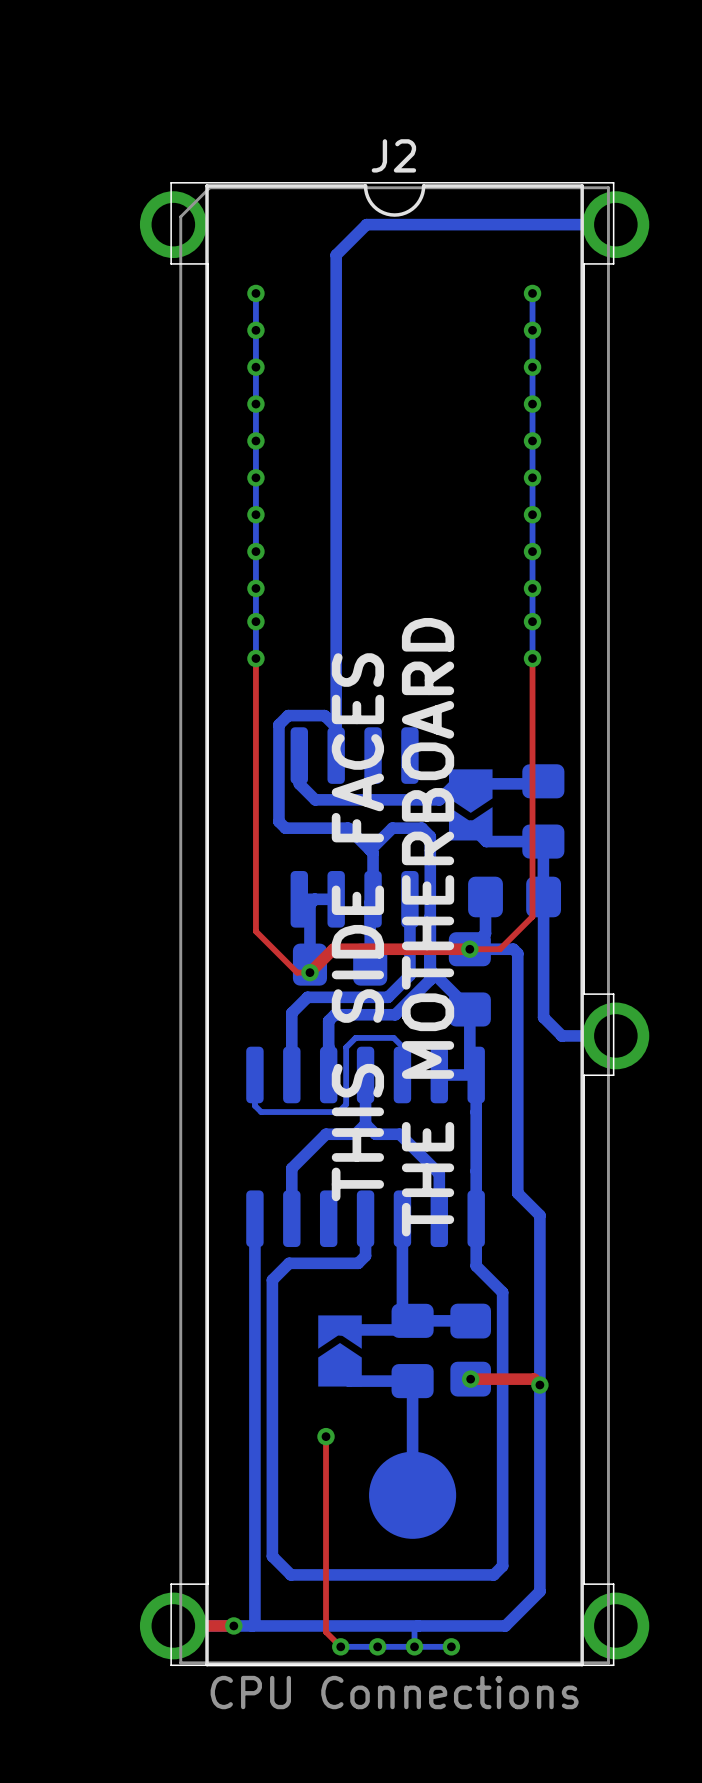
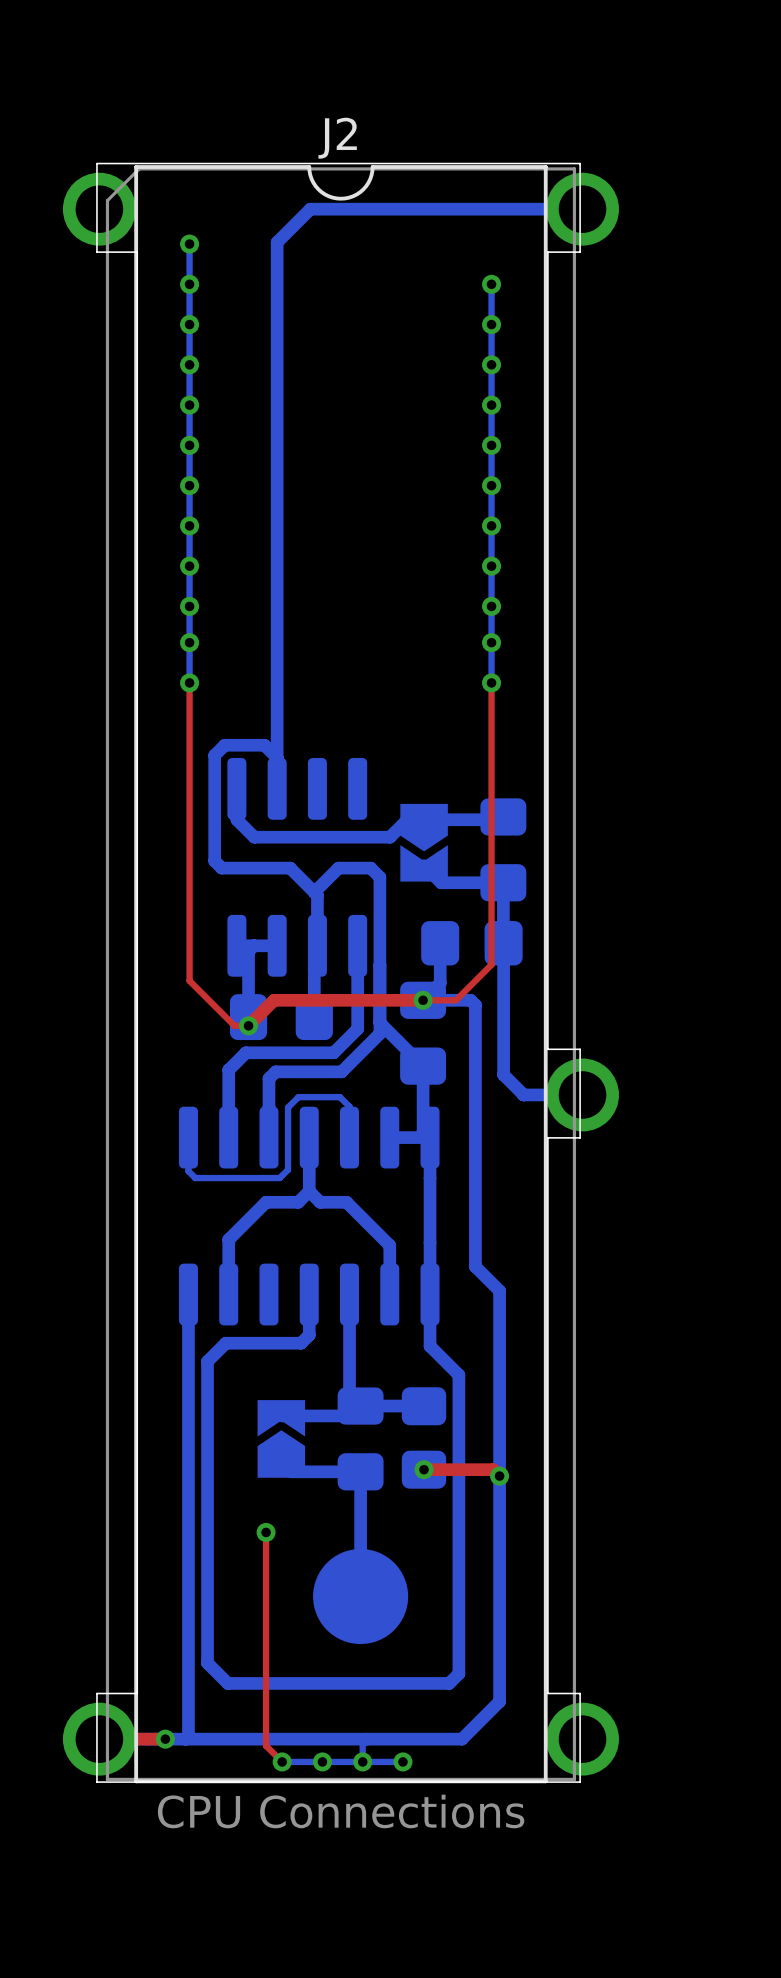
bottom track: none -> (189, 244) (189, 284)
via: none -> (189, 244)
text: THIS SIDE FACES (357, 927) -> none
text: THE MOTHERBOARD (428, 927) -> none

